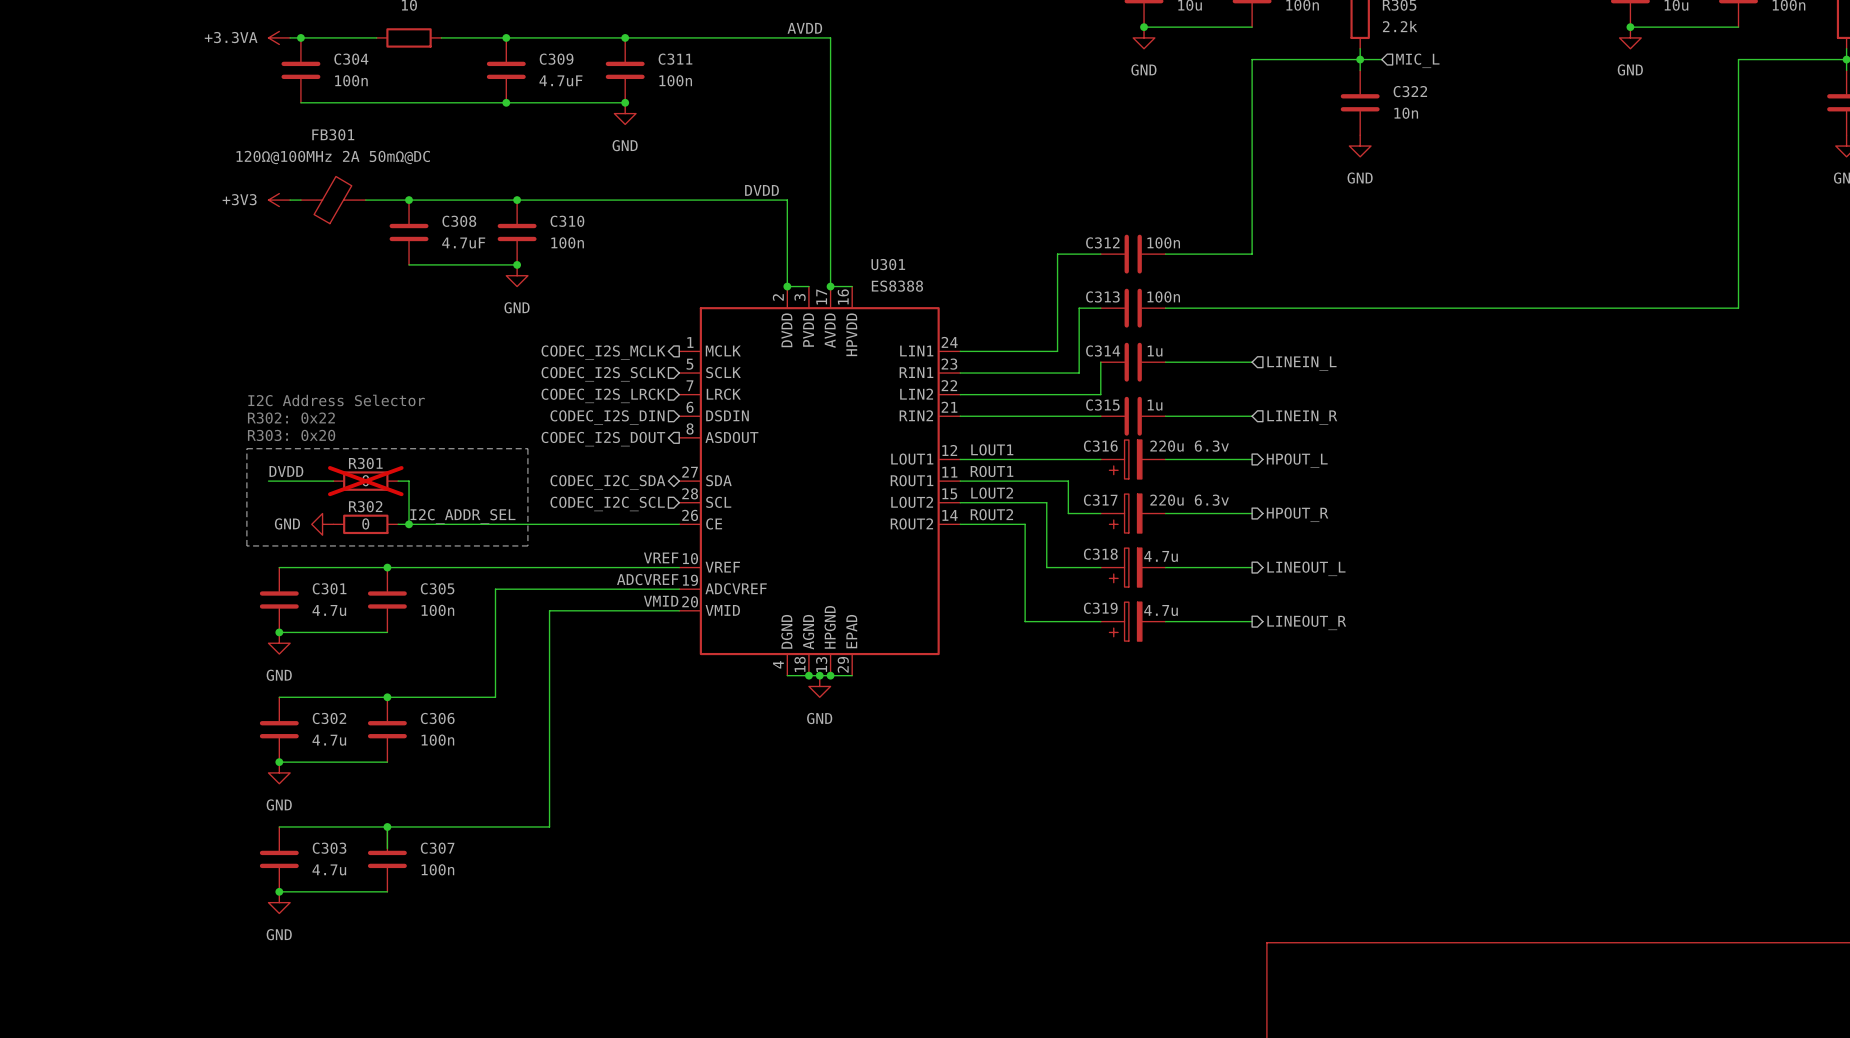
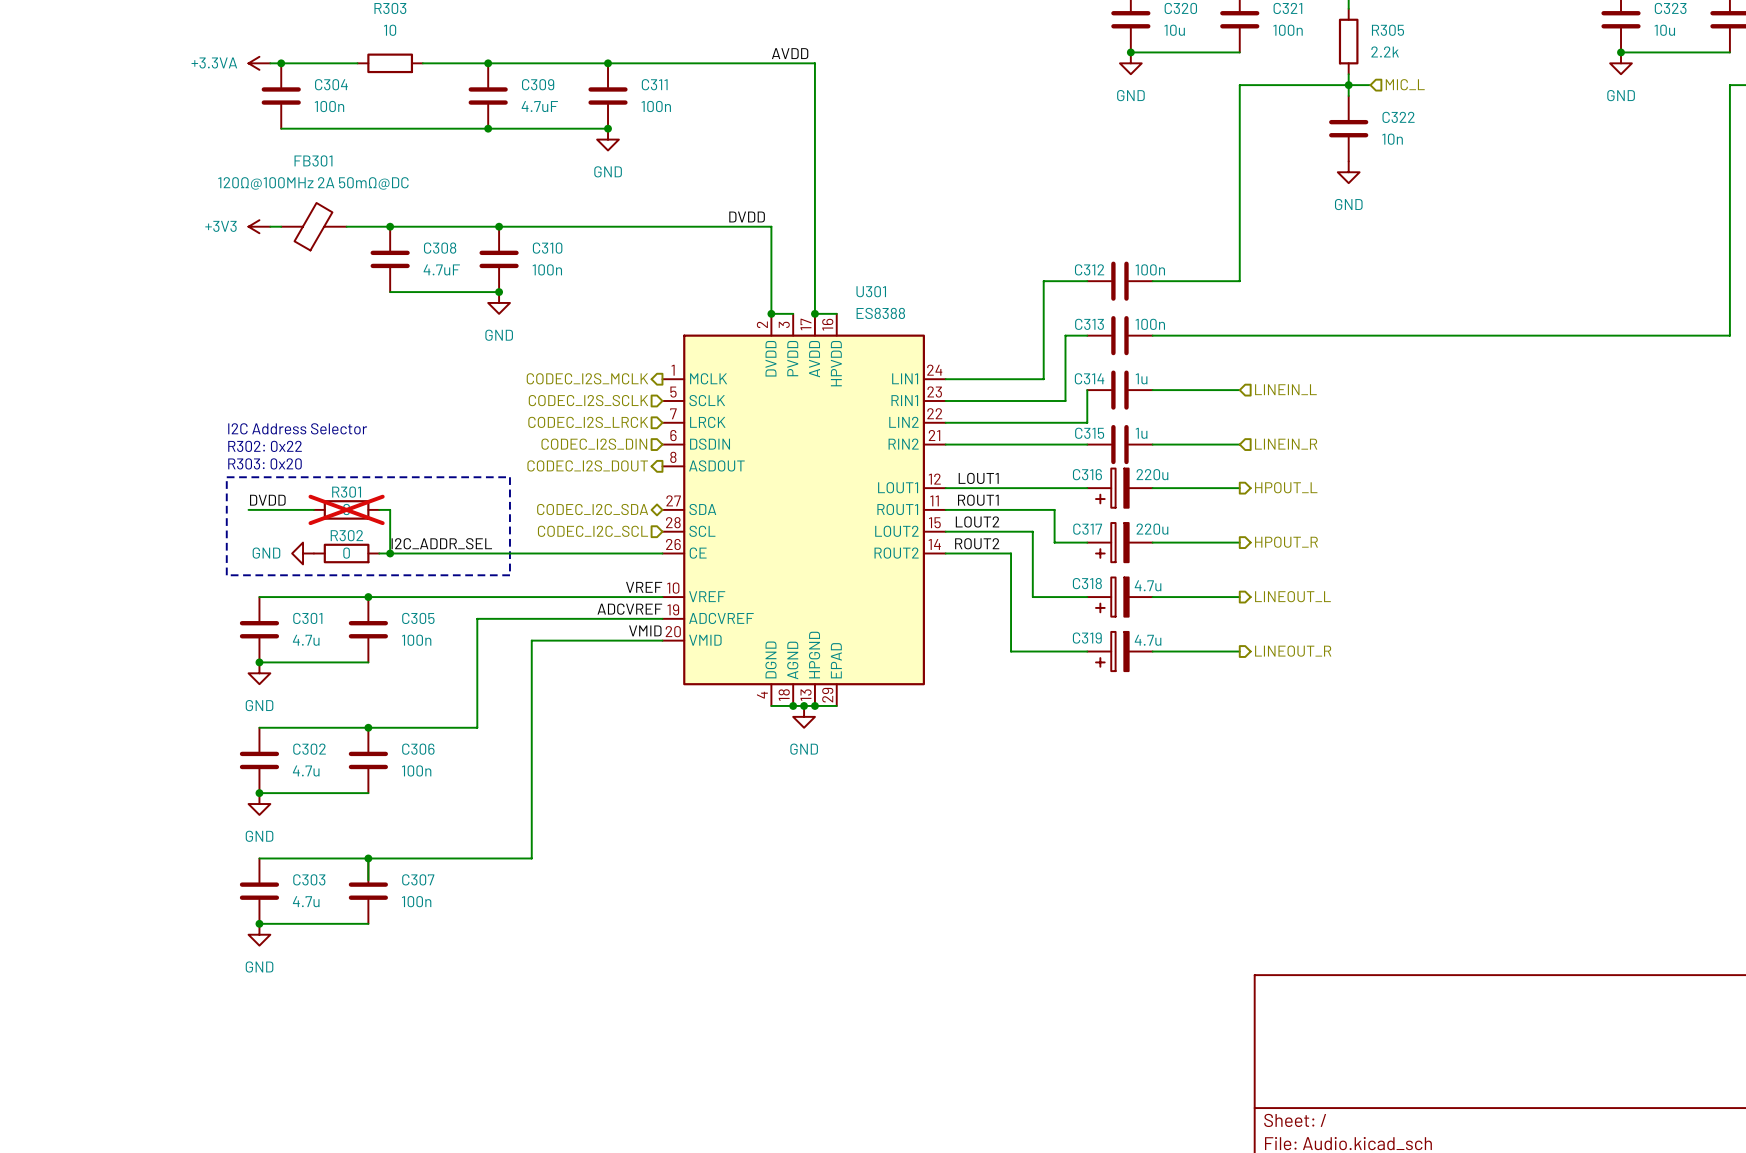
C316 value: 220u 6.3v (1189, 446) -> 220u (1152, 474)
C317 value: 220u 6.3v (1189, 500) -> 220u (1152, 529)

